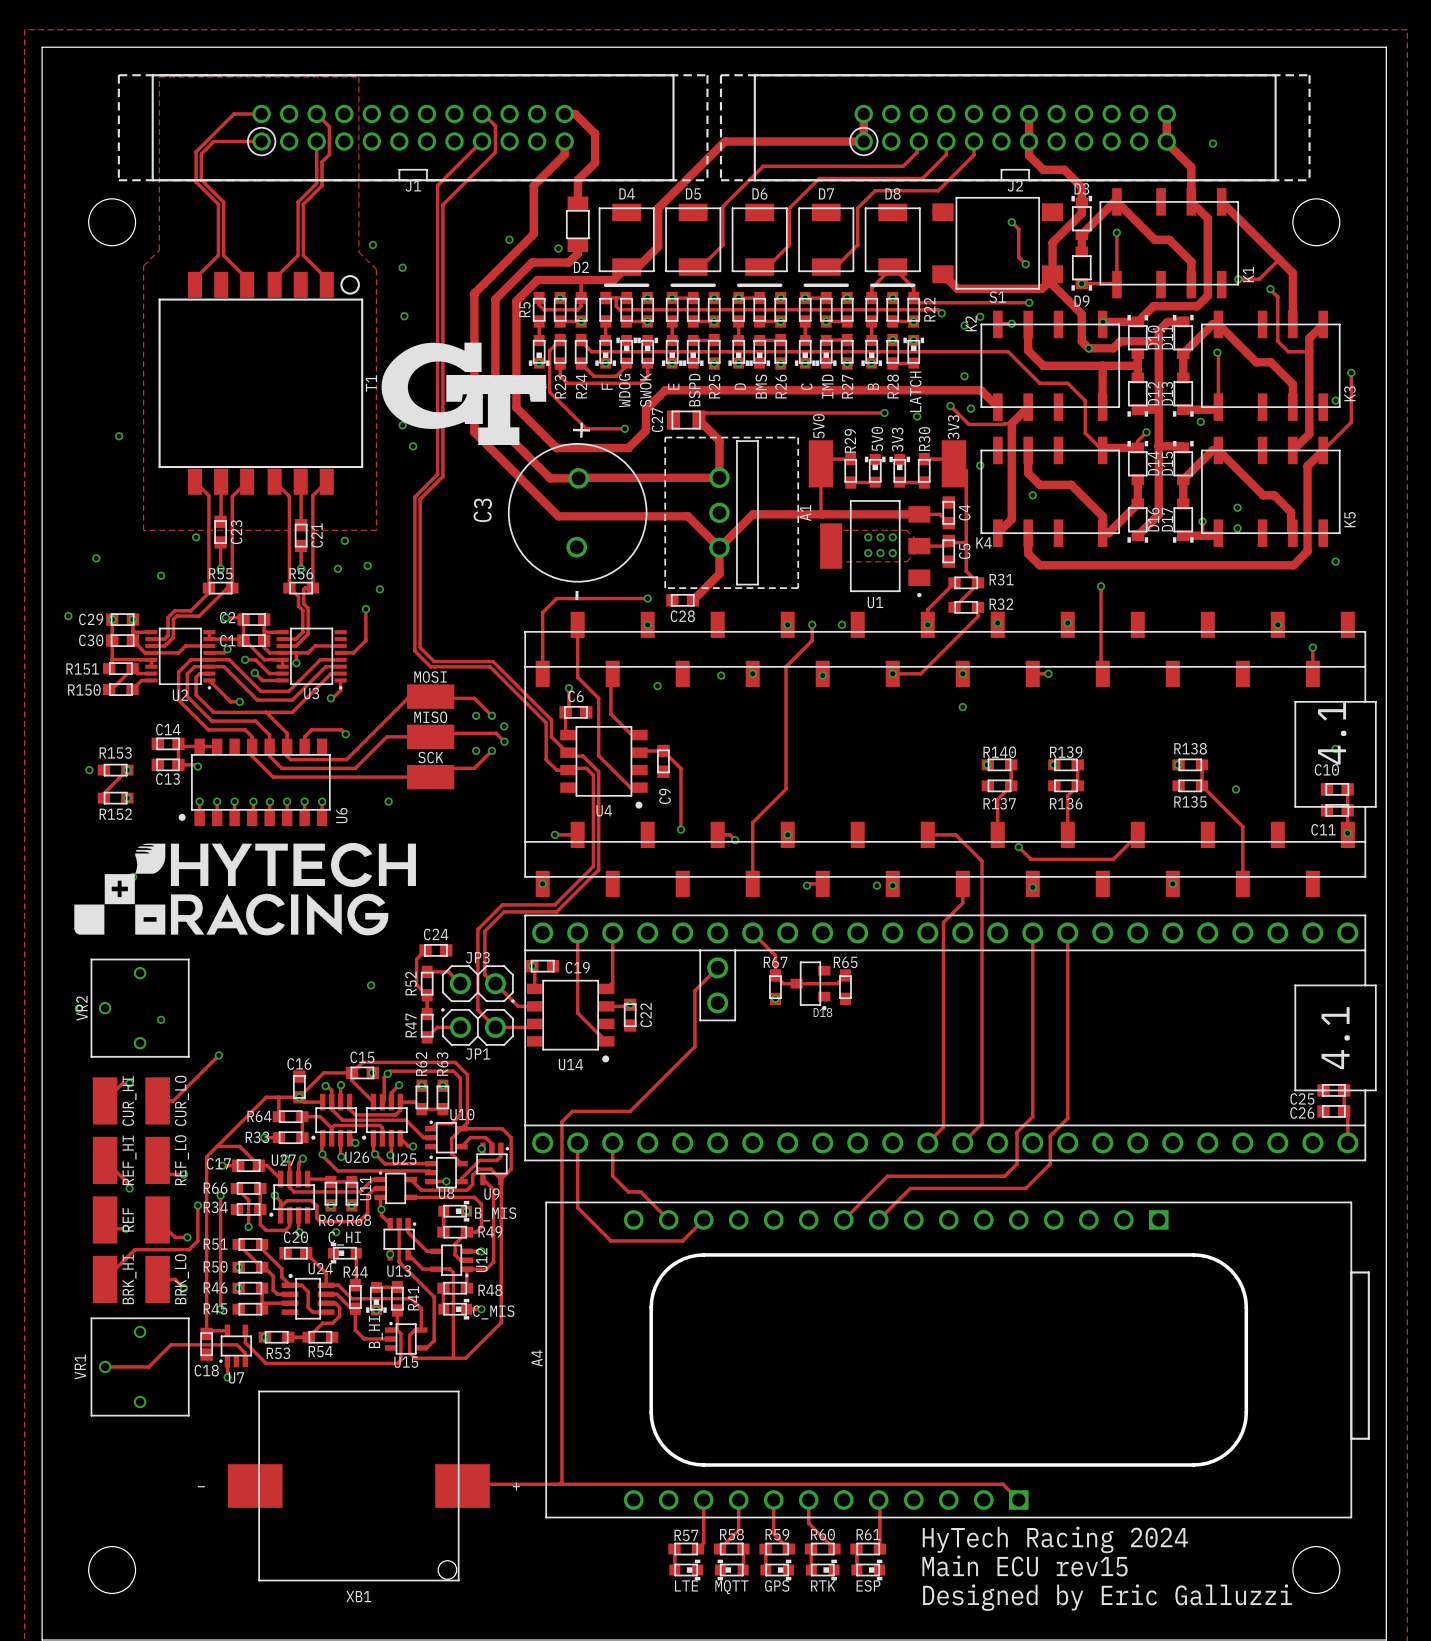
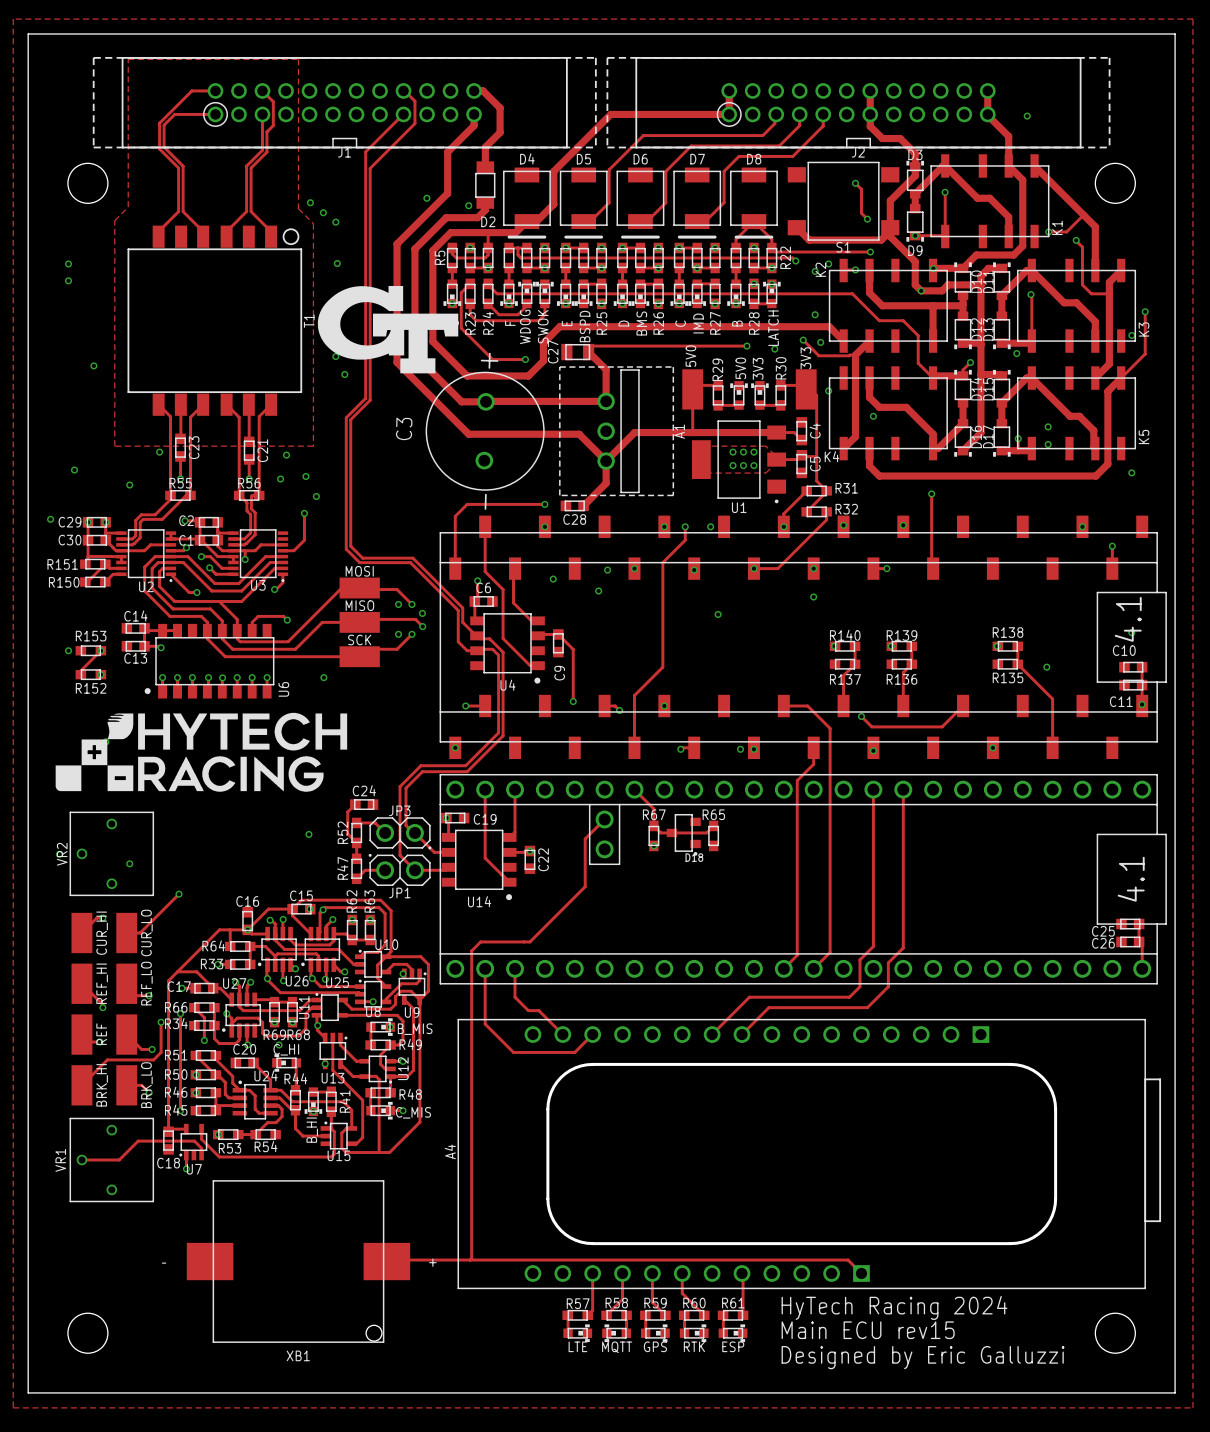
via: none -> (323, 212)
via: none -> (68, 263)
via: none -> (68, 280)
via: none -> (598, 591)
via: none -> (718, 614)

